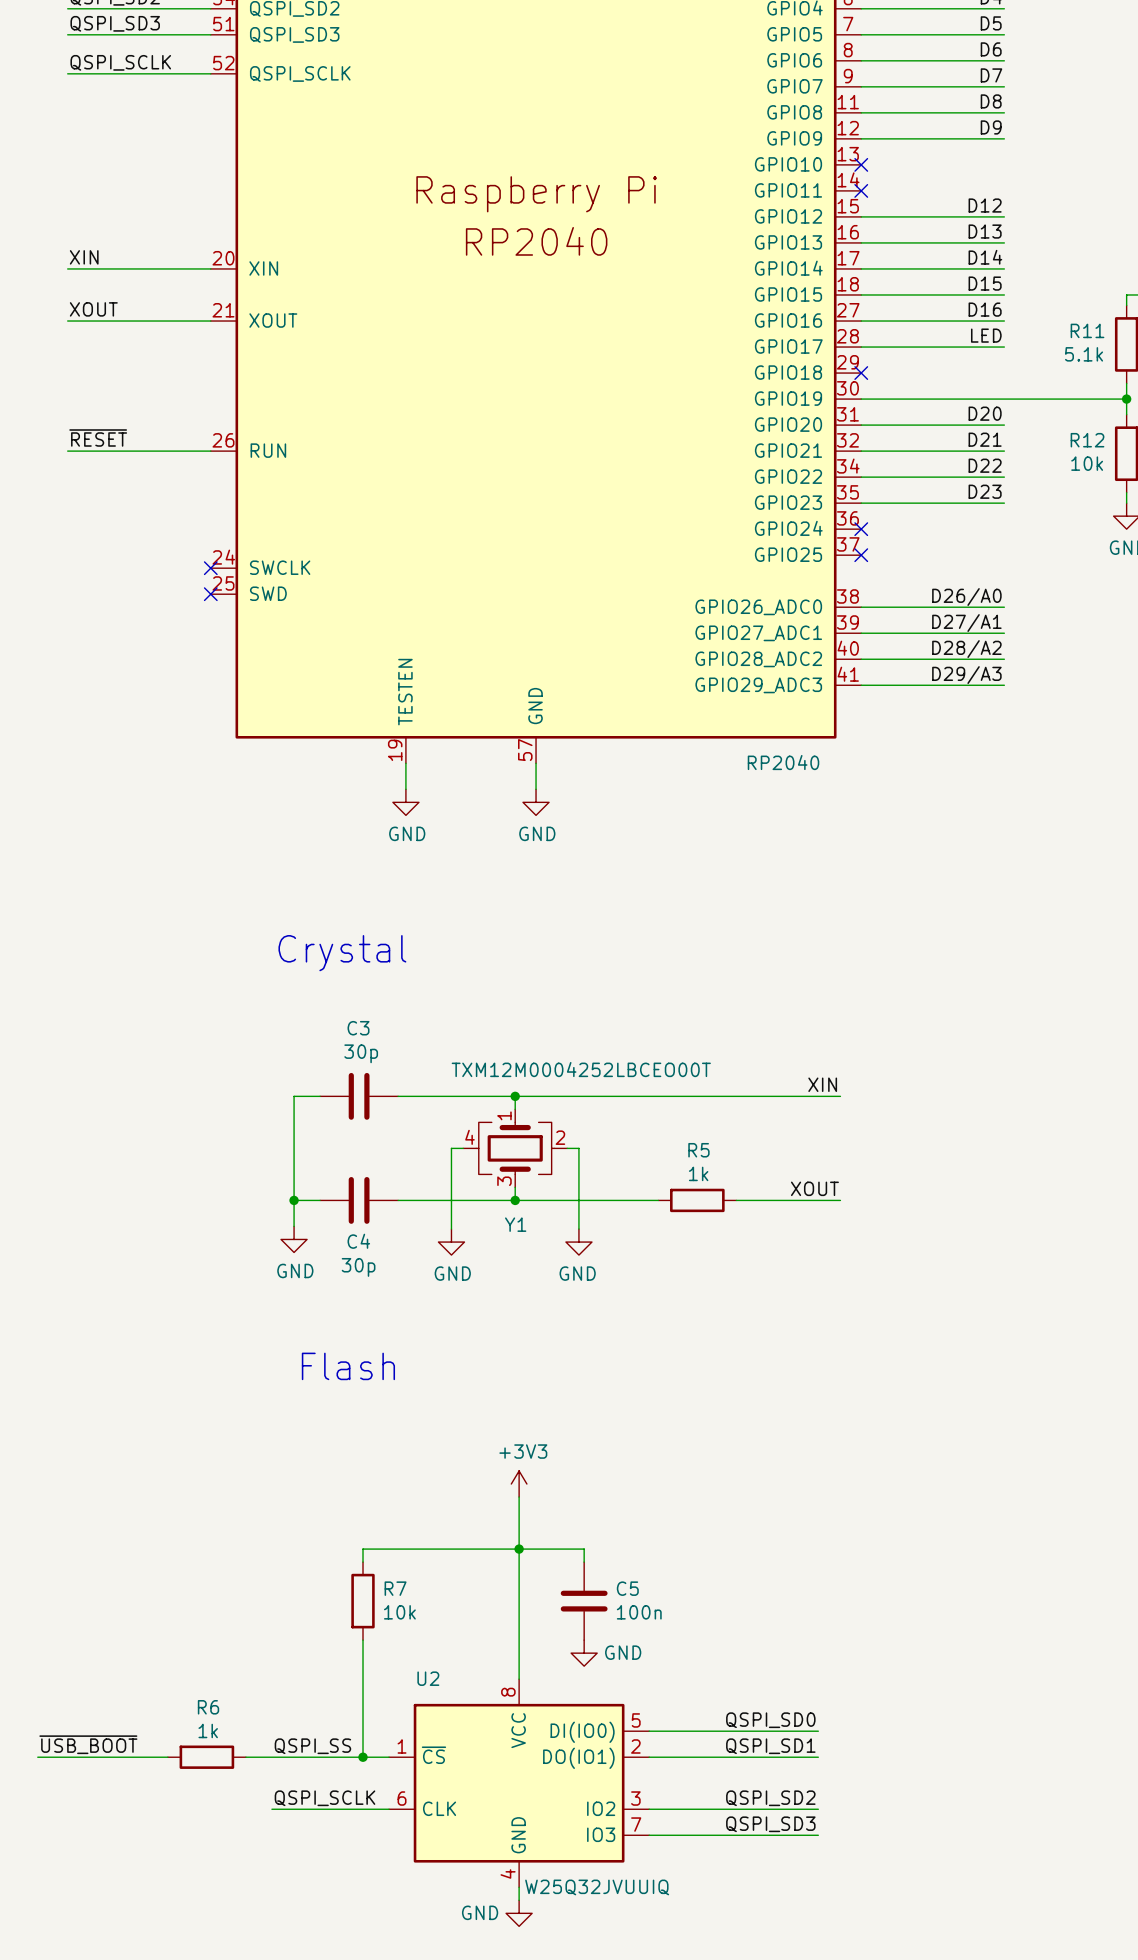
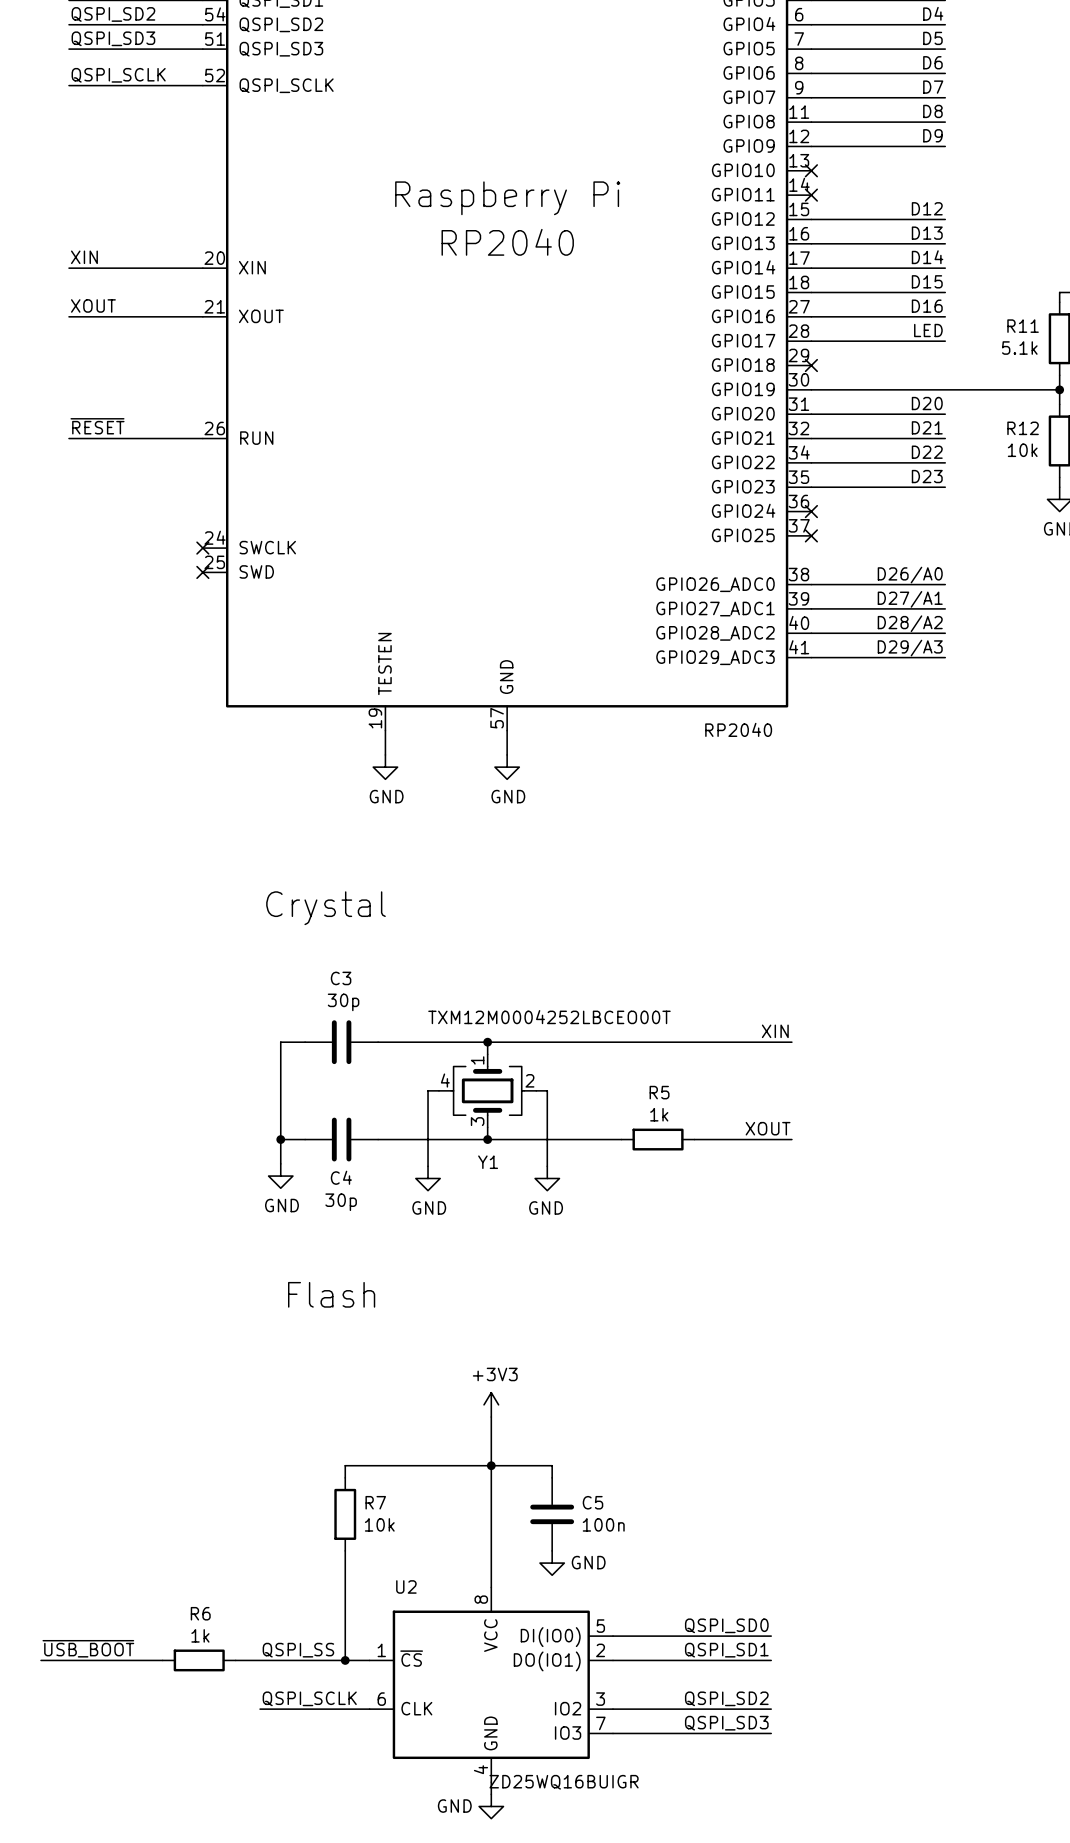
U2 value: W25Q32JVUUIQ (597, 1887) -> ZD25WQ16BUIGR (564, 1782)

